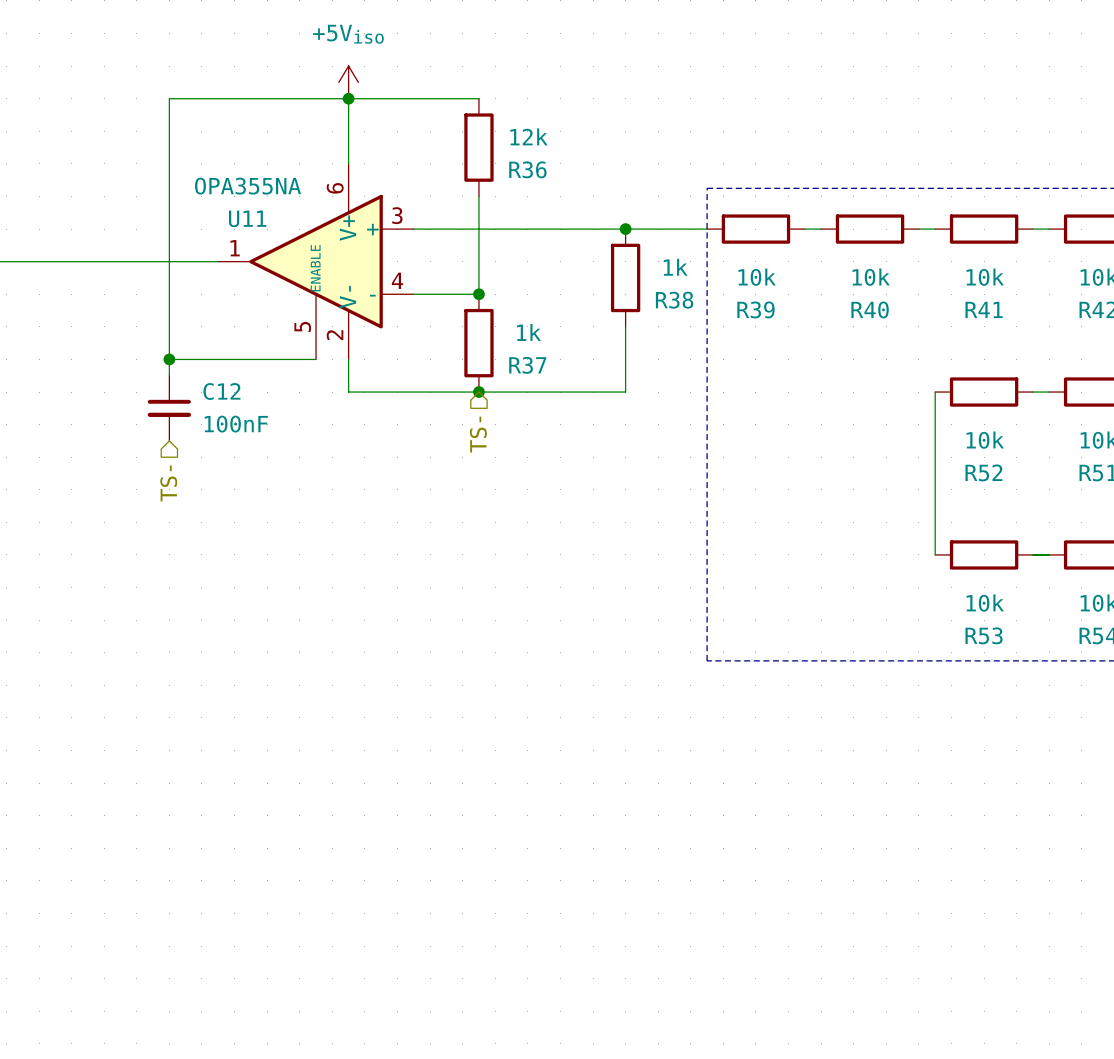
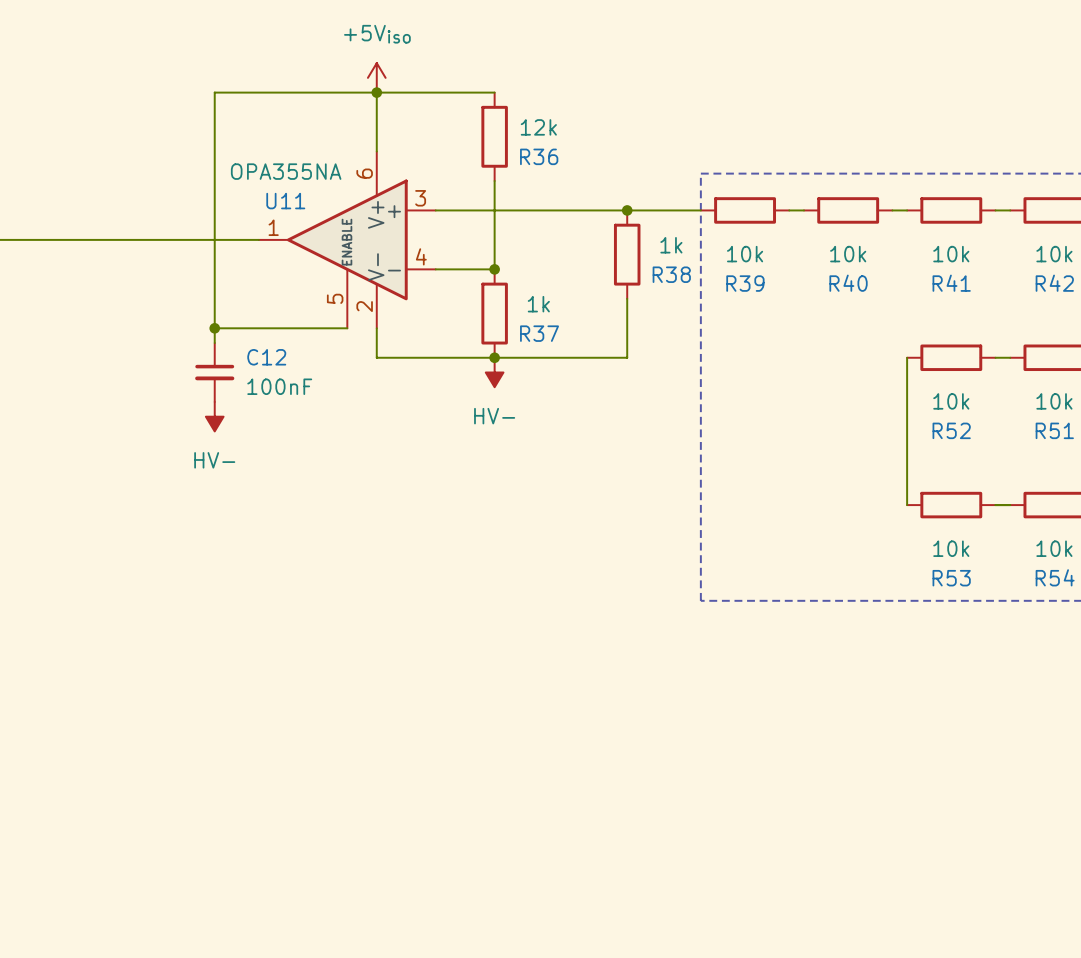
power symbol: none -> HV- (494, 372)
hierarchical label: TS- (478, 434) -> none
power symbol: none -> HV- (214, 416)
hierarchical label: TS- (168, 483) -> none

